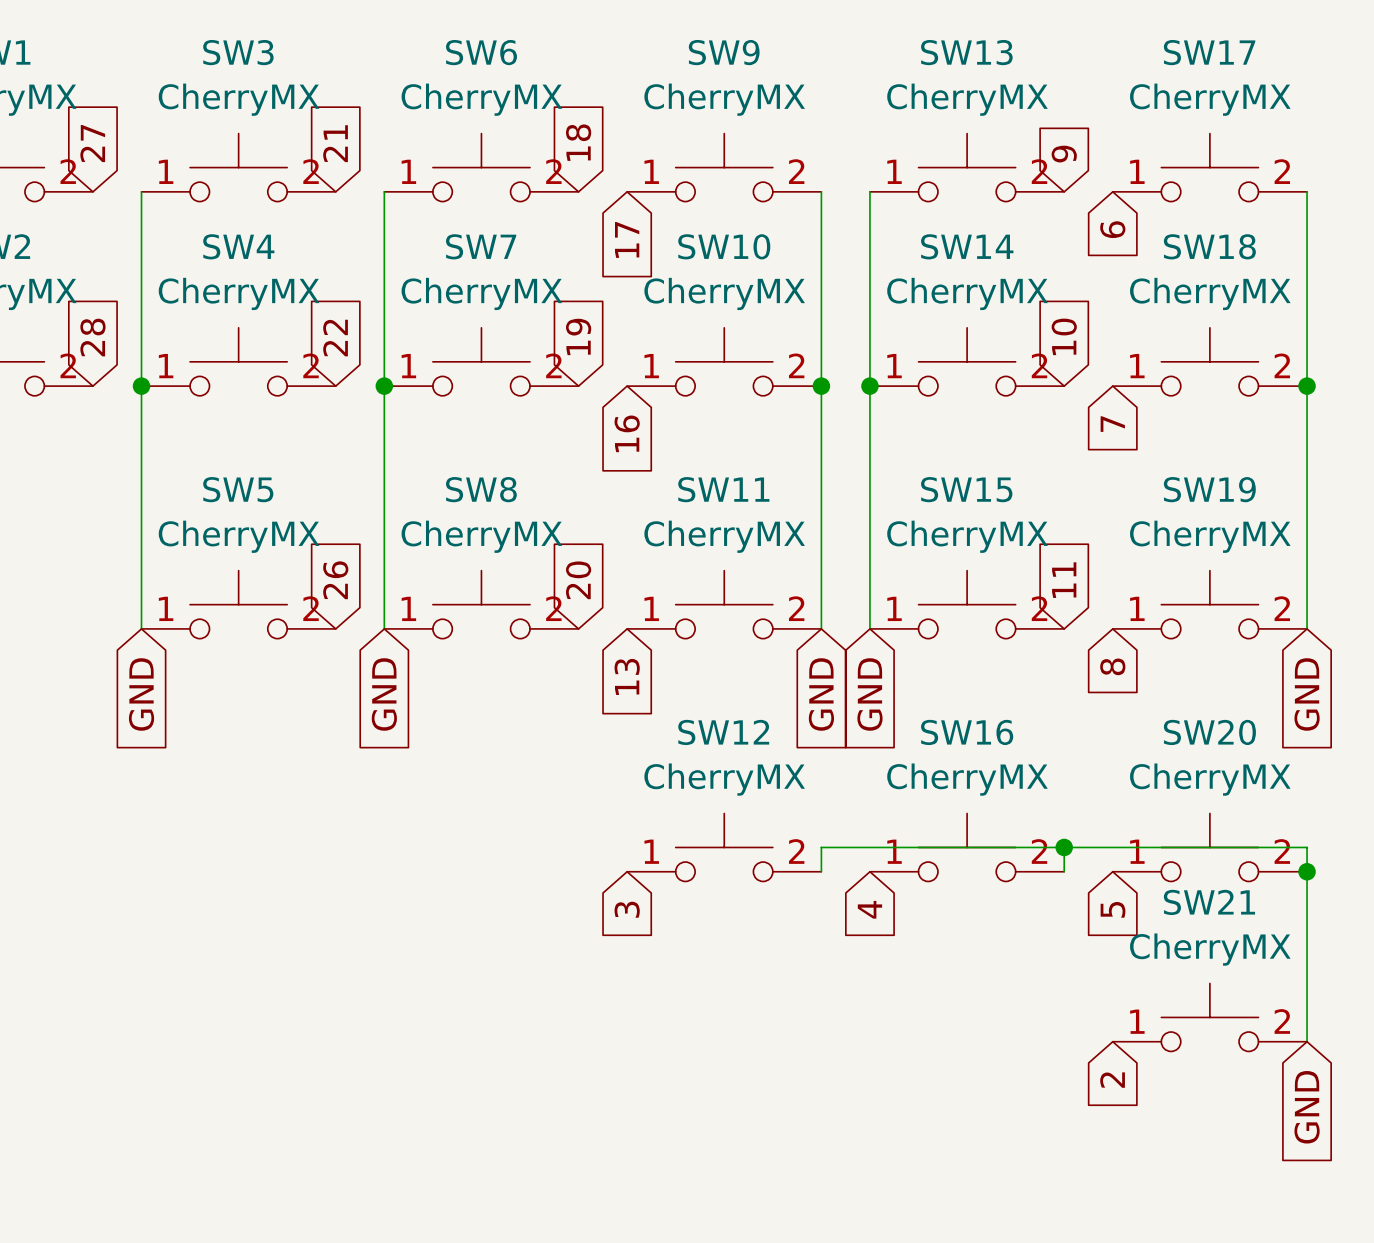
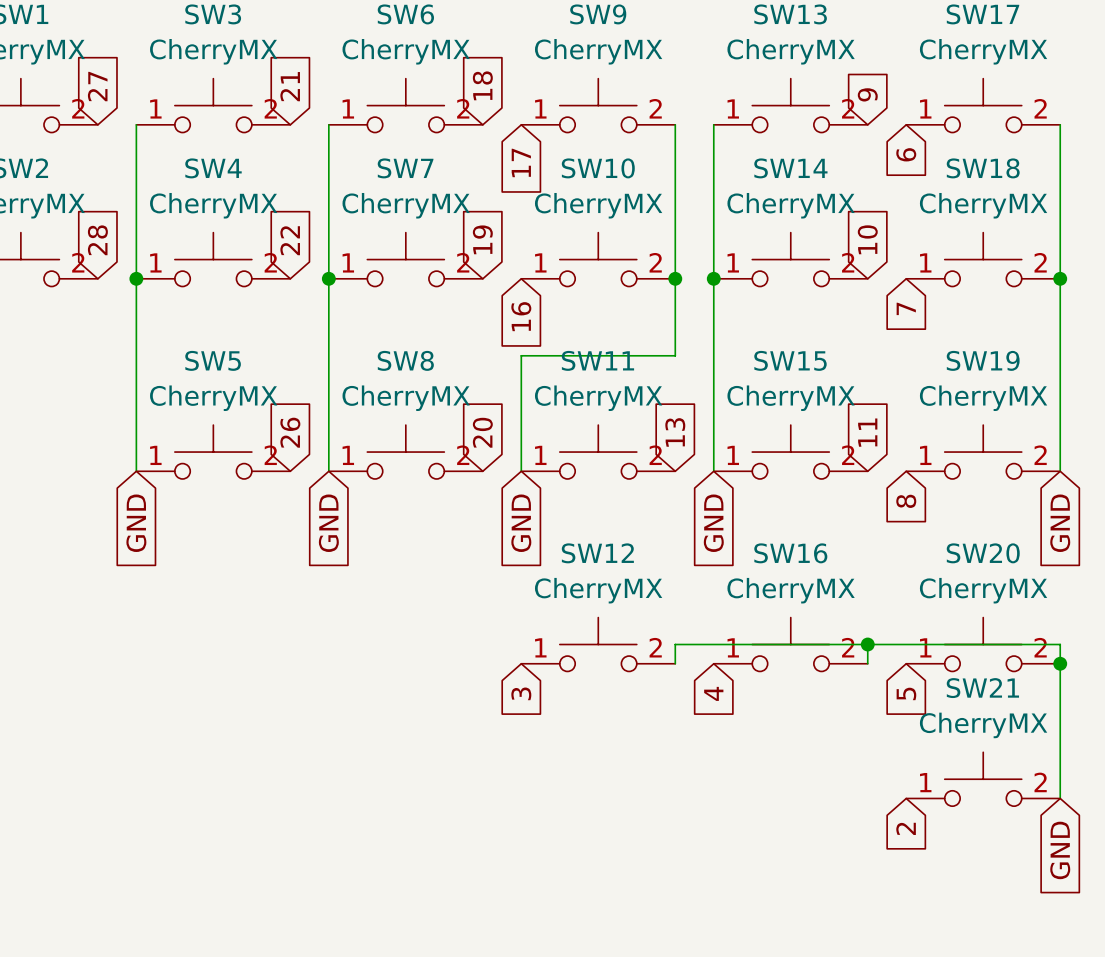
wire: (821, 483) (821, 628) -> (675, 355) (521, 355) (521, 471)
global label: 13 (627, 676) -> GND (521, 523)
global label: GND (821, 694) -> 13 (675, 432)

